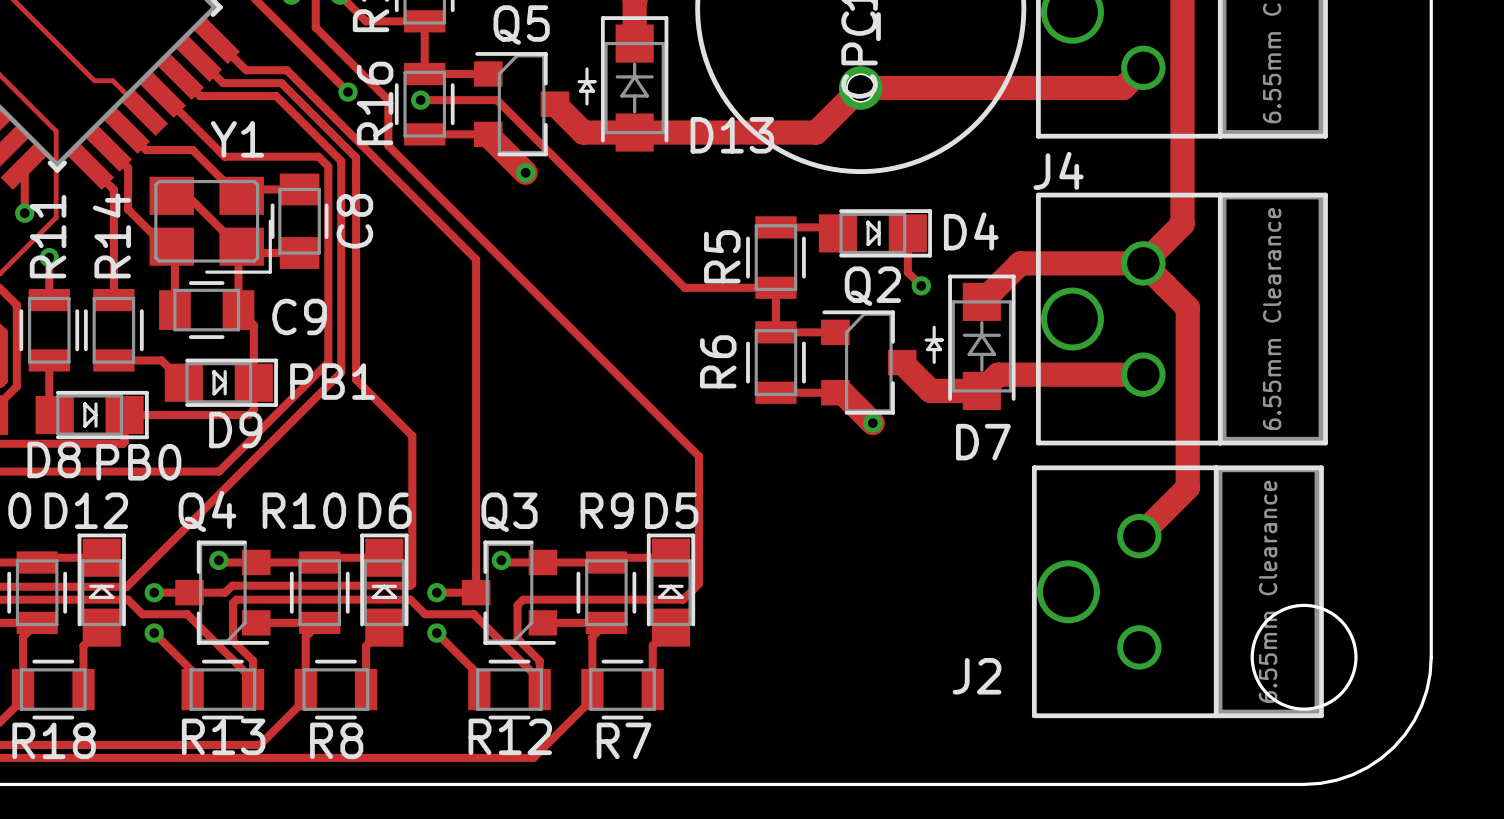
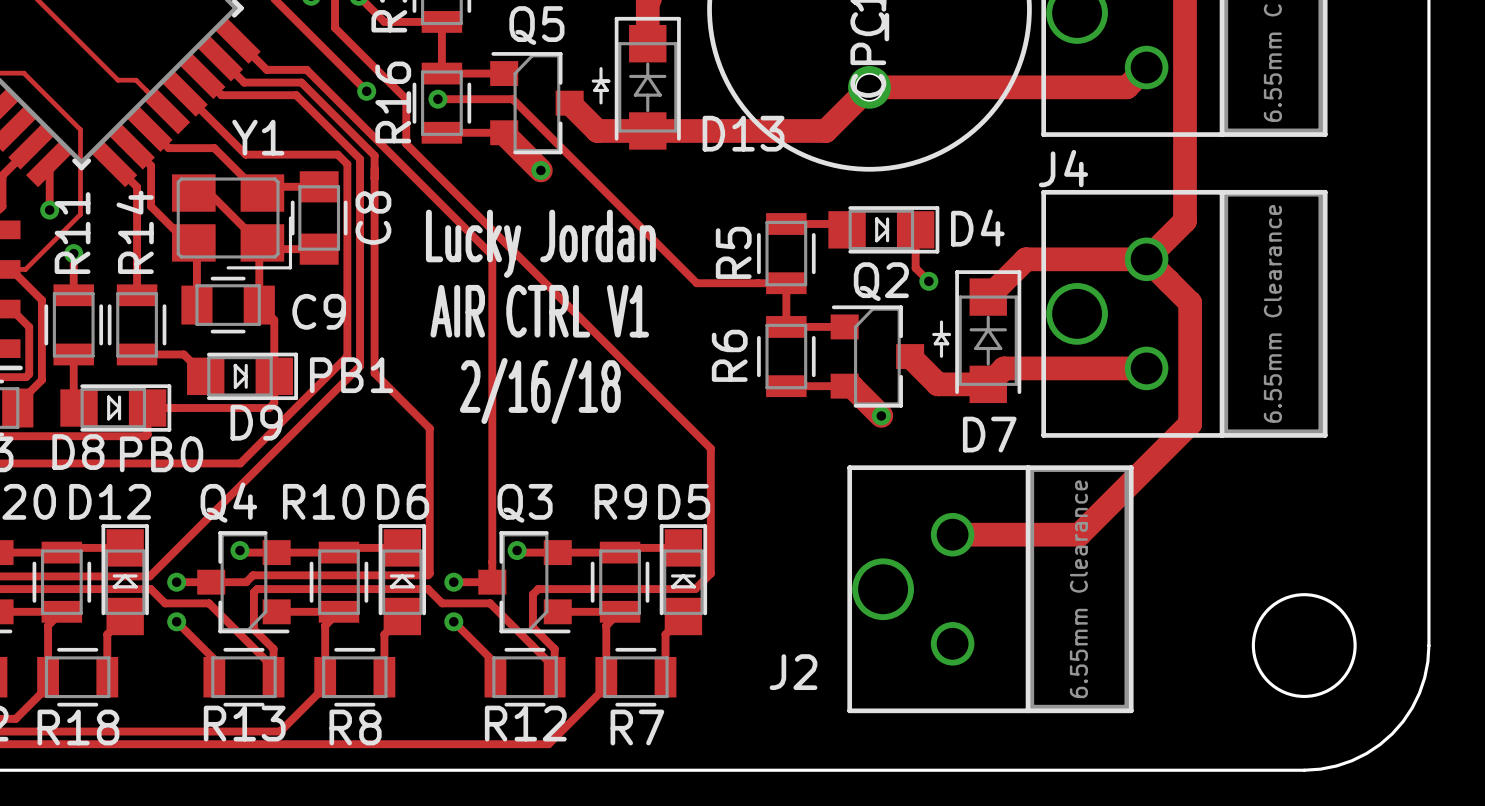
text: none -> Lucky Jordan (540, 243)
text: none -> AIR CTRL V1 (539, 311)
text: none -> 2/16/18 (540, 390)
track: (1187, 431) (1187, 487) (1139, 536) -> (1190, 423) (1079, 534) (952, 534)
J2 position: (1177, 591) -> (990, 589)

